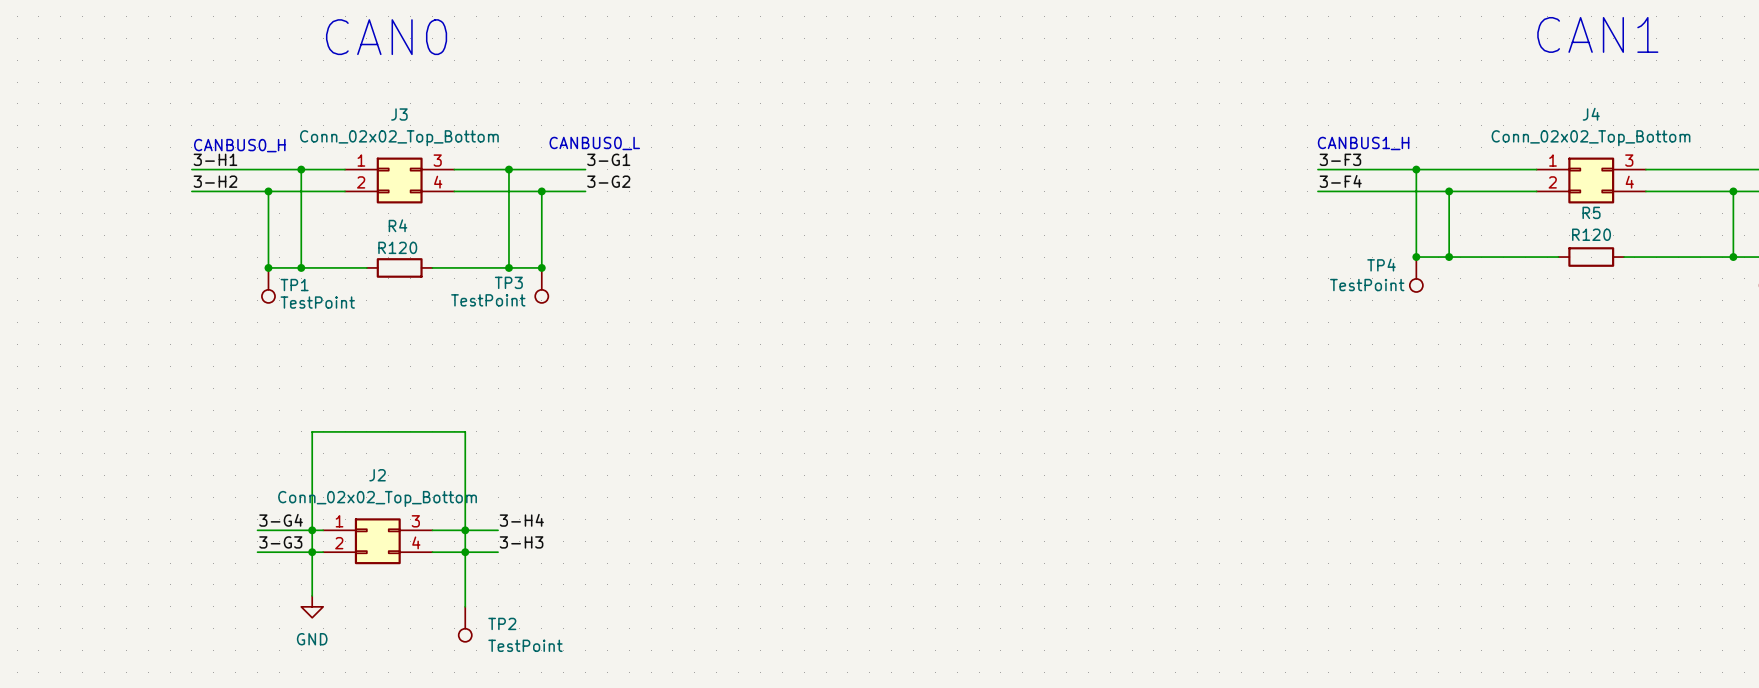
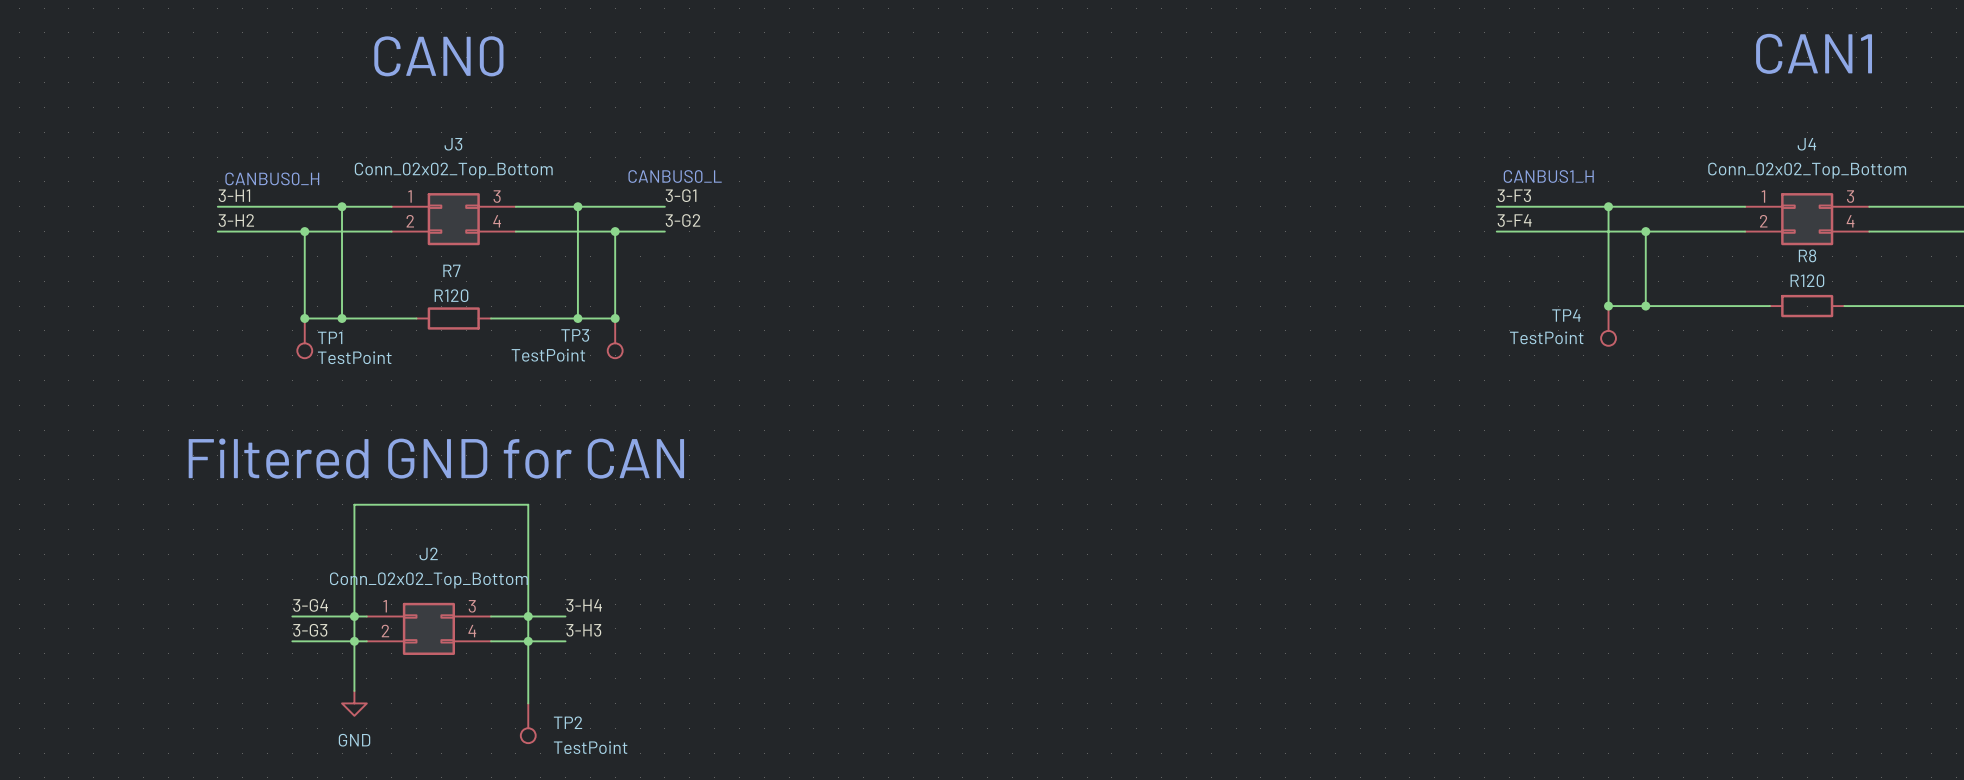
R5 name: R5 (1591, 212) -> R8 (1807, 255)
R4 name: R4 (398, 225) -> R7 (451, 270)
text: none -> Filtered GND for CAN (436, 458)

